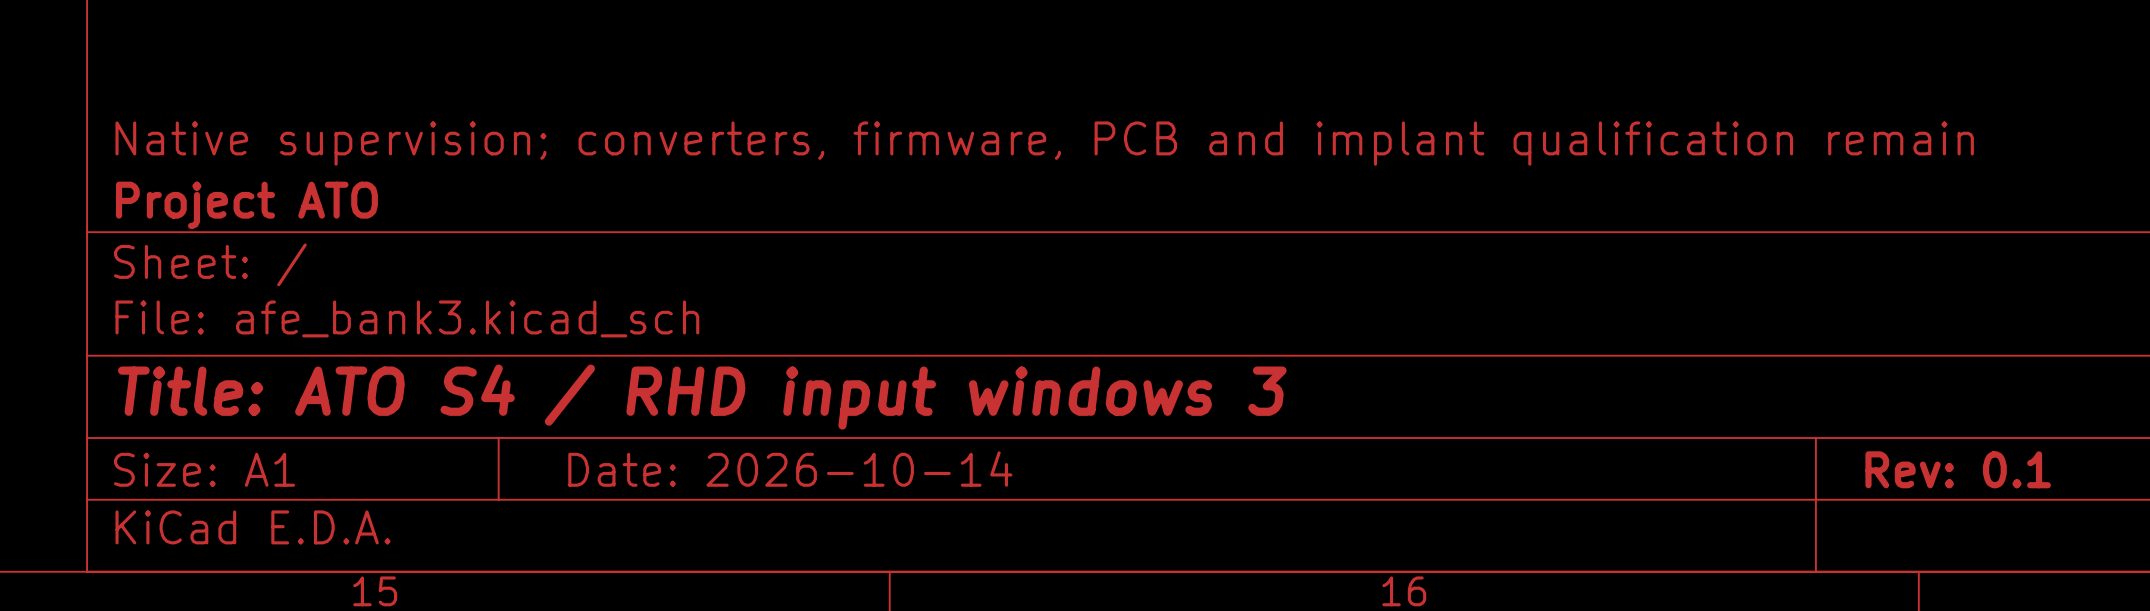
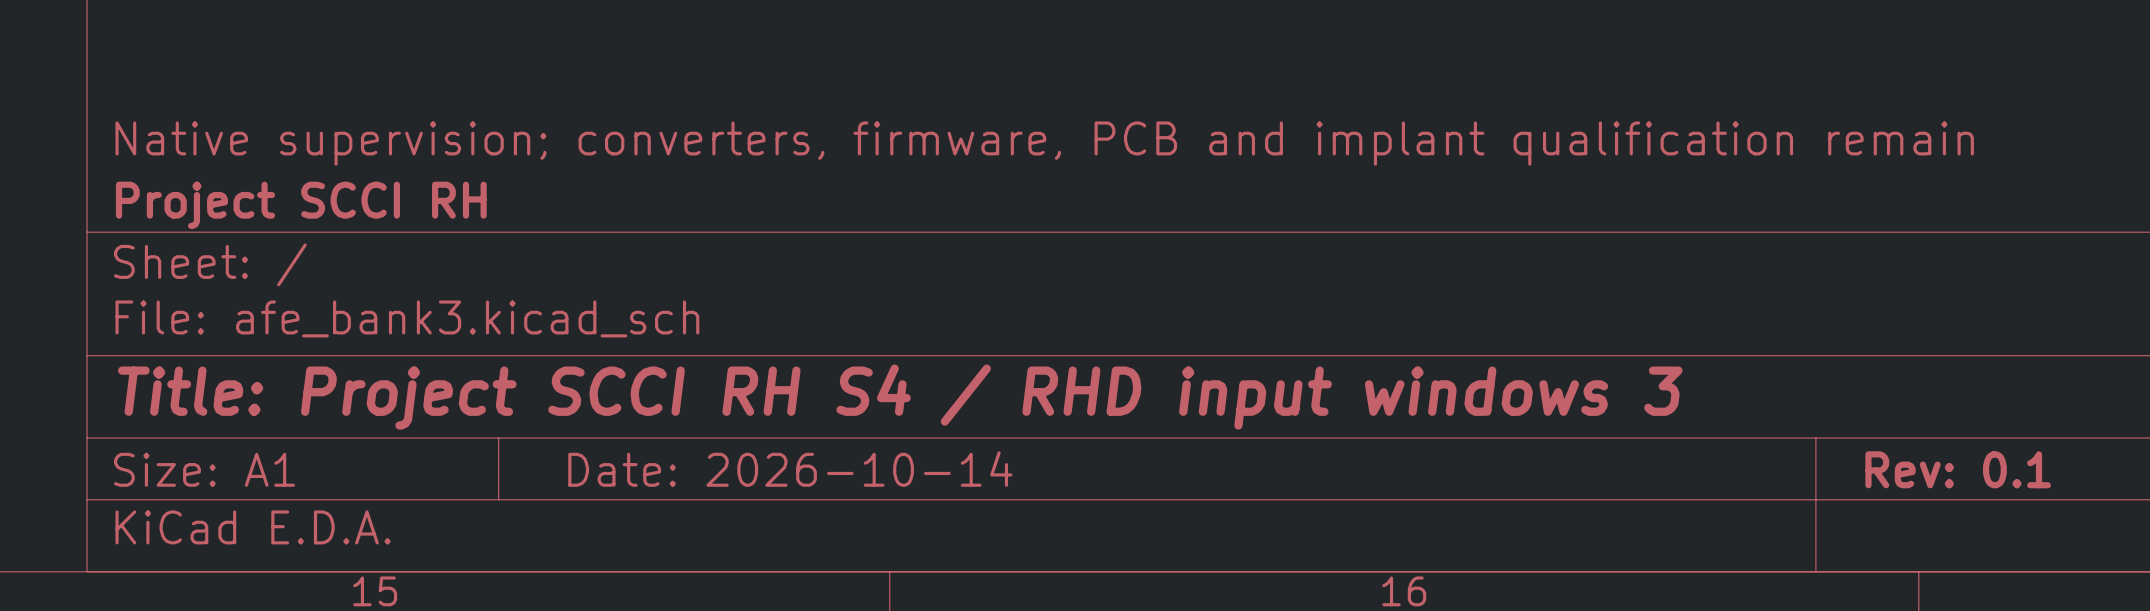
title block: Project ATO (246, 205) -> Project SCCI RH (301, 205)
title block: Title: ATO S4 / RHD input windows 3 (702, 397) -> Title: Project SCCI RH S4 / RHD input windows 3 (900, 397)

